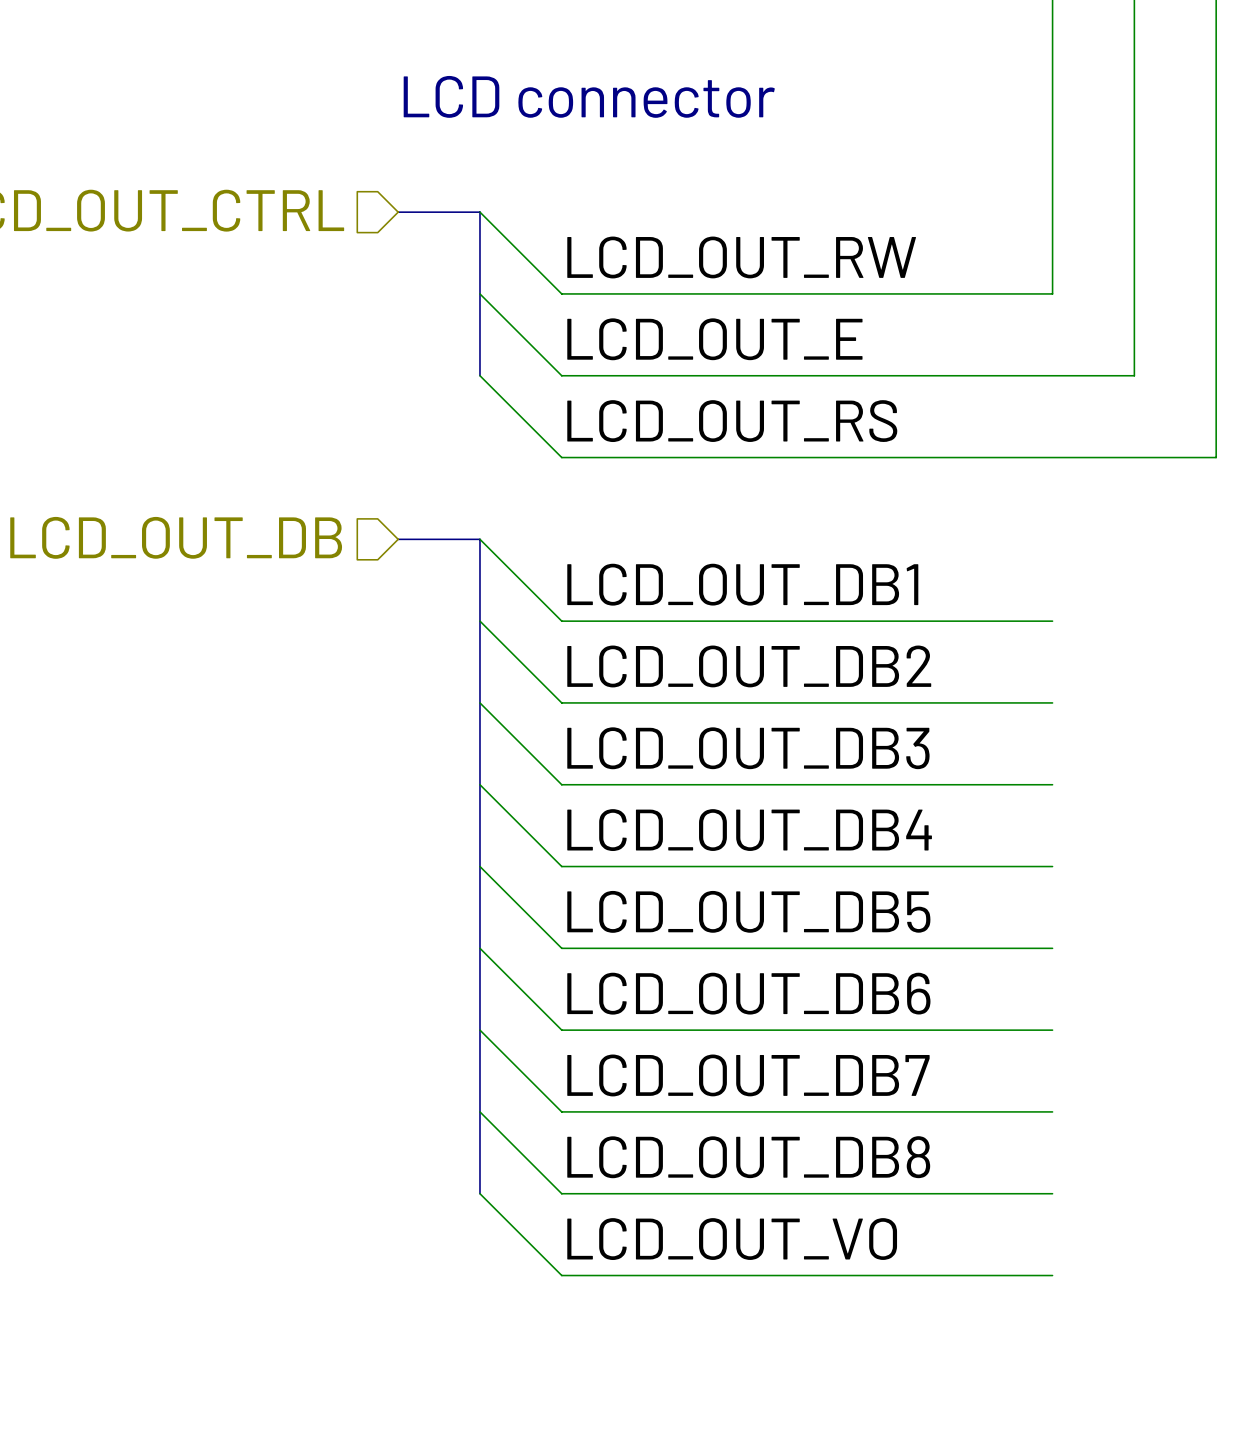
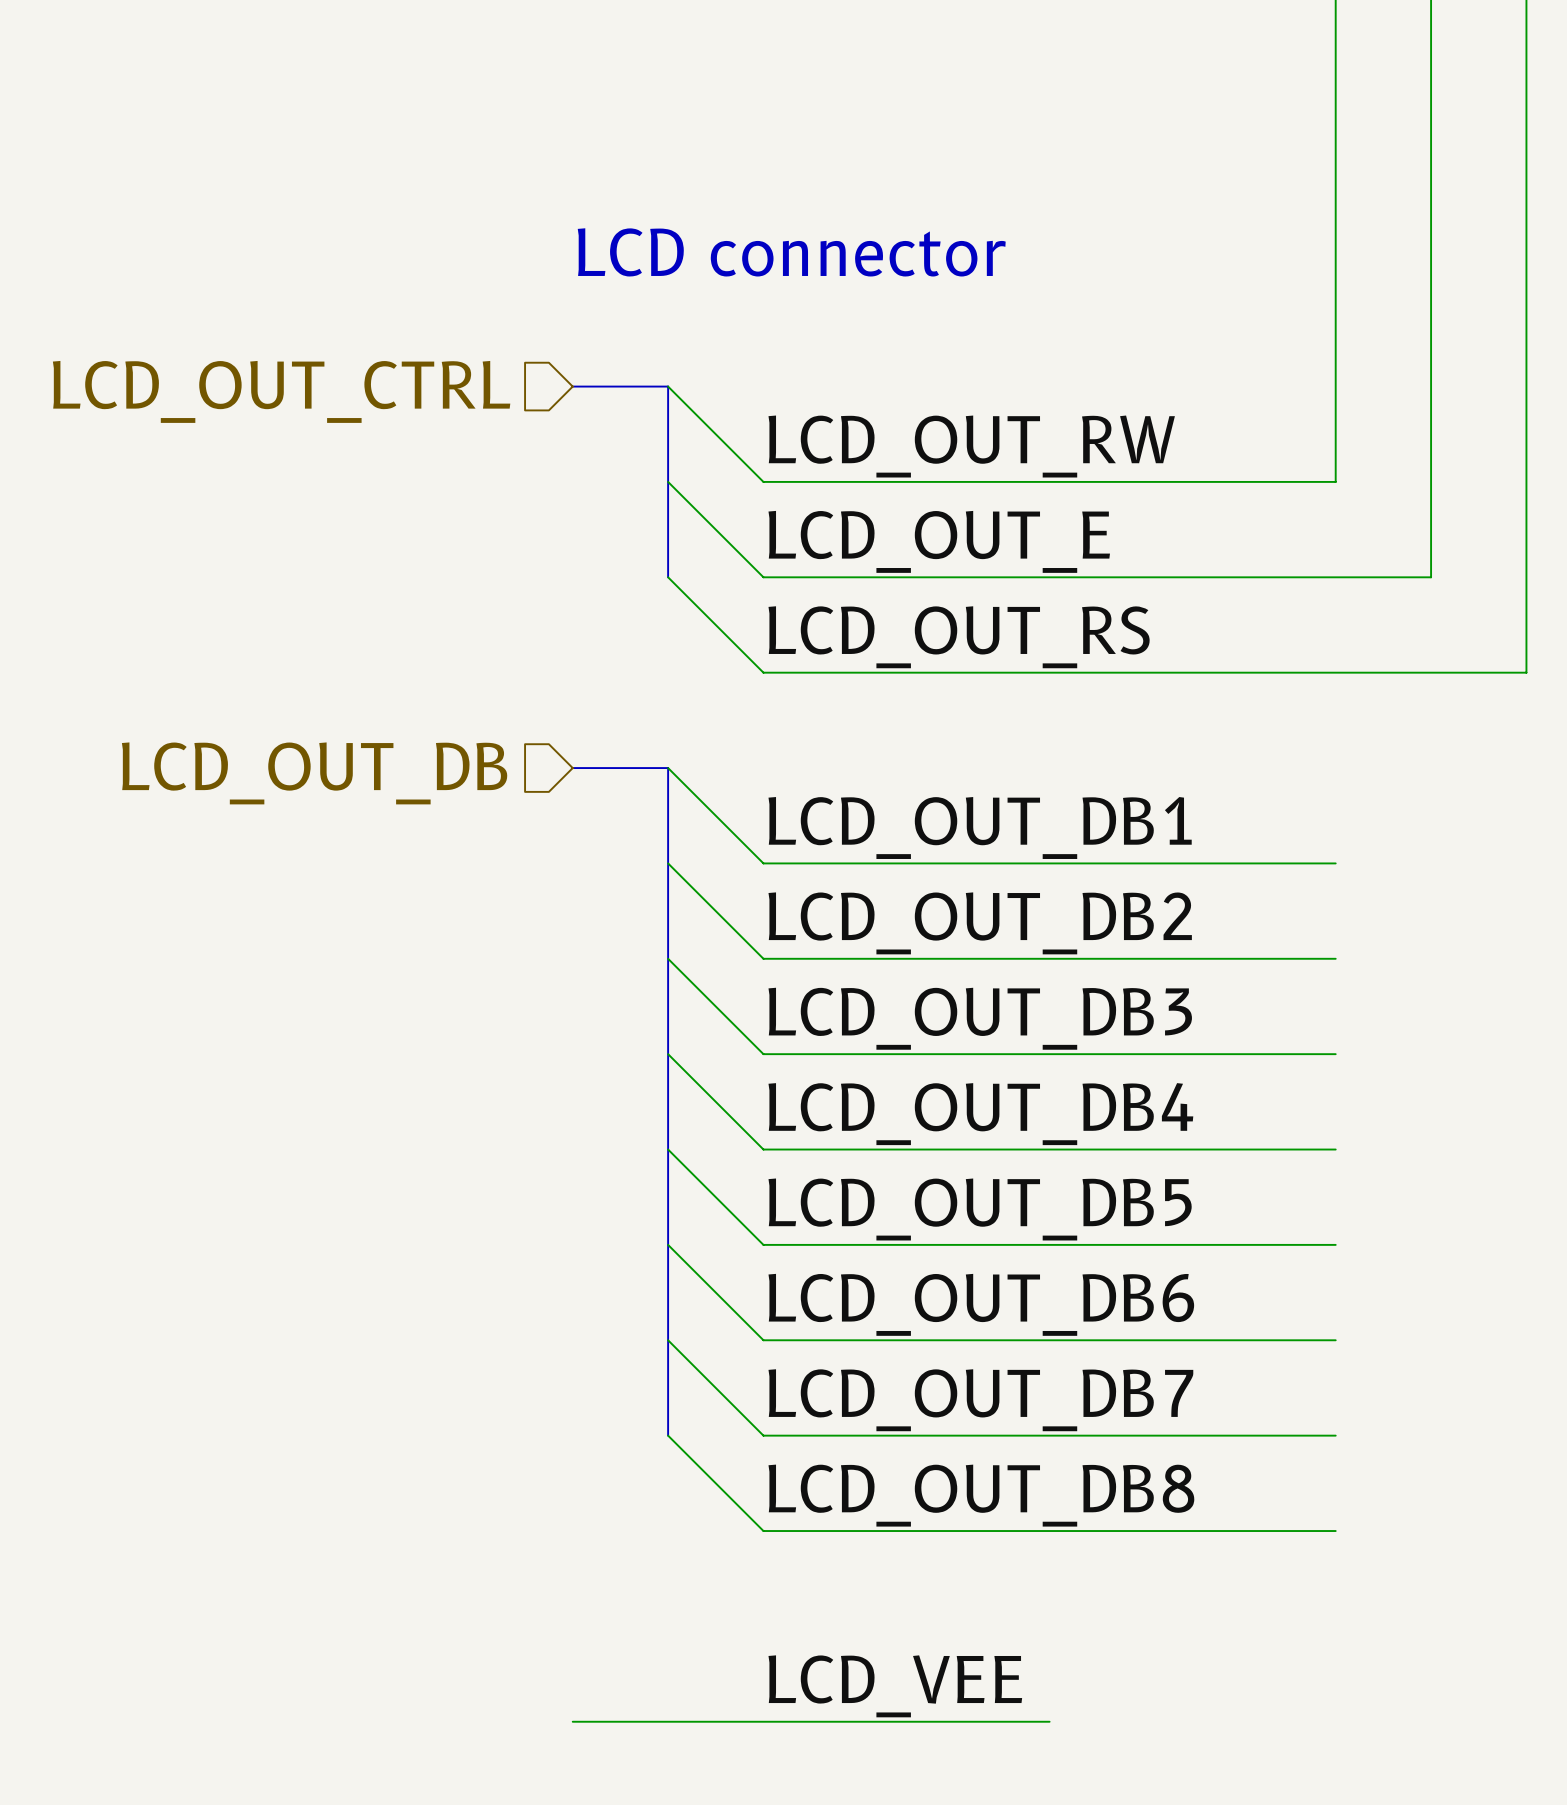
bus: (479, 1111) (479, 1193) -> none
wire: (479, 1193) (561, 1275) (1052, 1275) -> none
label: LCD_OUT_VO (732, 1239) -> none
label: none -> LCD_VEE (895, 1686)
wire: none -> (572, 1721) (1049, 1721)

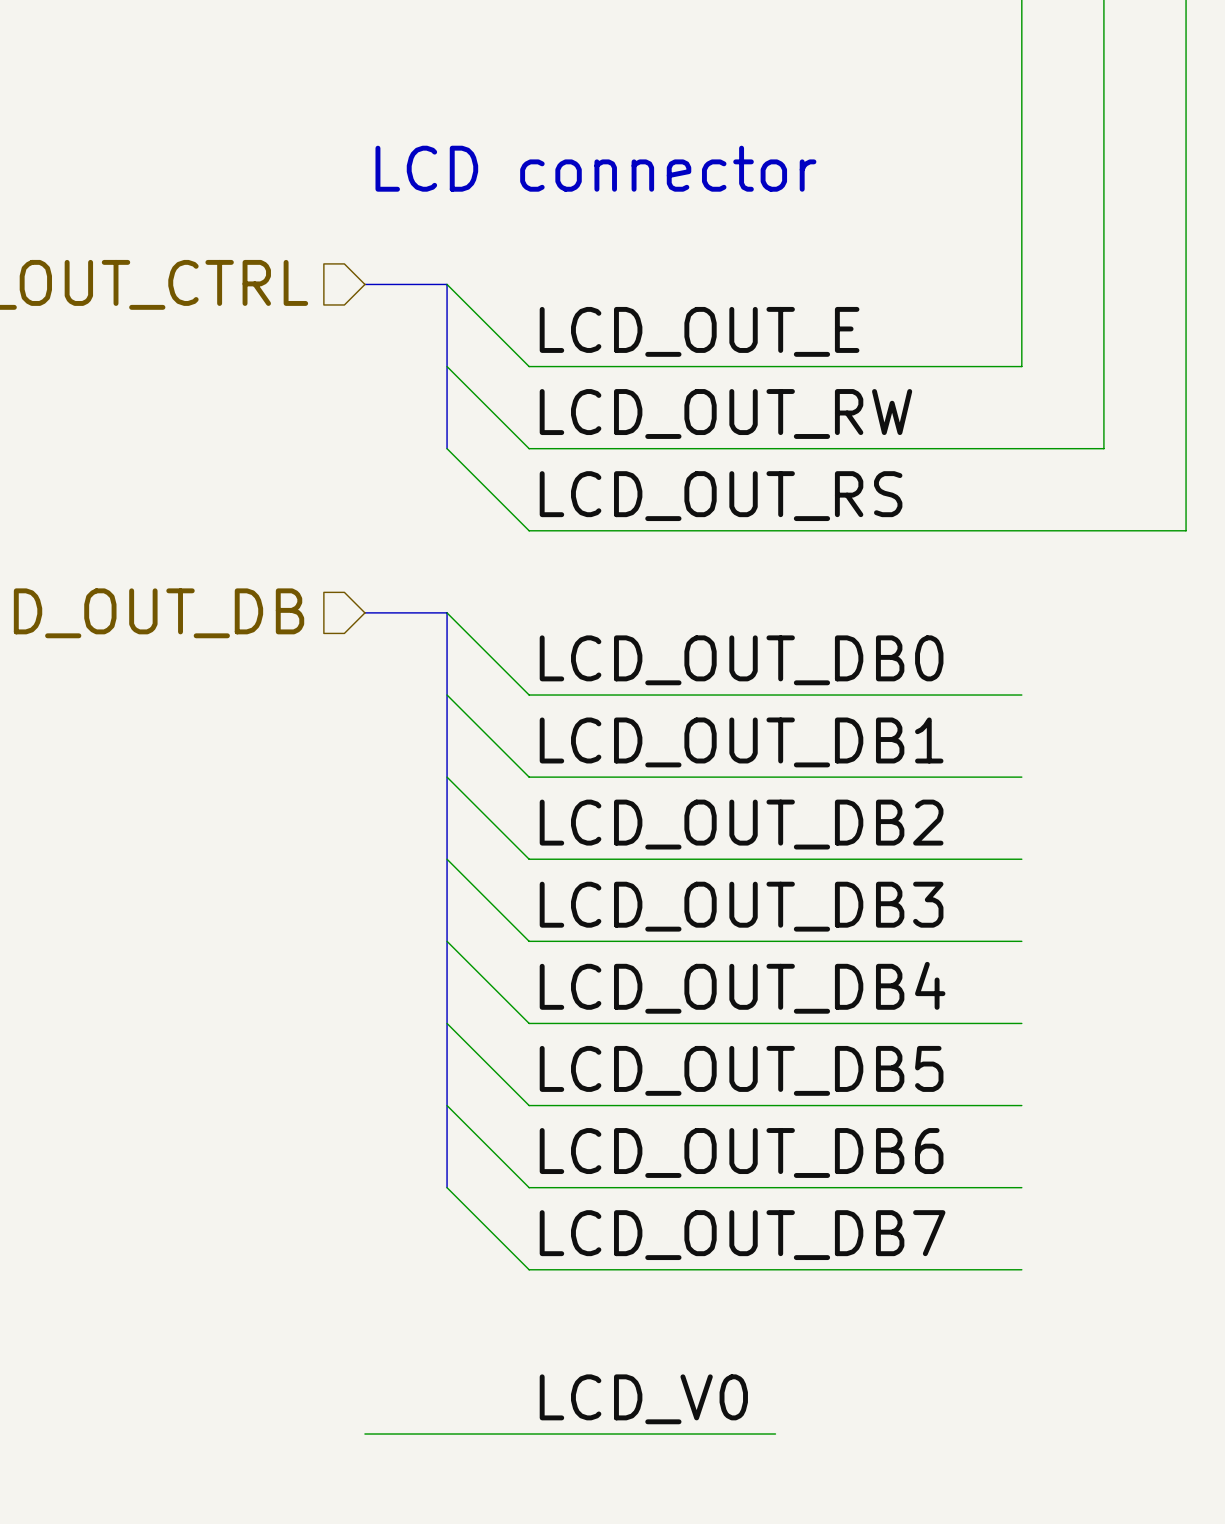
label: LCD_OUT_RW (971, 446) -> LCD_OUT_E (699, 331)
label: LCD_OUT_E (939, 541) -> LCD_OUT_RW (725, 413)
label: LCD_OUT_DB1 (980, 828) -> LCD_OUT_DB0 (741, 660)
label: LCD_OUT_DB2 (980, 923) -> LCD_OUT_DB1 (741, 742)
label: LCD_OUT_DB3 (980, 1018) -> LCD_OUT_DB2 (741, 824)
label: LCD_OUT_DB4 (980, 1114) -> LCD_OUT_DB3 (741, 906)
label: LCD_OUT_DB5 (980, 1209) -> LCD_OUT_DB4 (742, 987)
label: LCD_OUT_DB6 (981, 1304) -> LCD_OUT_DB5 (741, 1070)
label: LCD_OUT_DB7 (980, 1400) -> LCD_OUT_DB6 (741, 1152)
label: LCD_OUT_DB8 (981, 1495) -> LCD_OUT_DB7 (742, 1235)
label: LCD_VEE (895, 1686) -> LCD_V0 (643, 1399)

